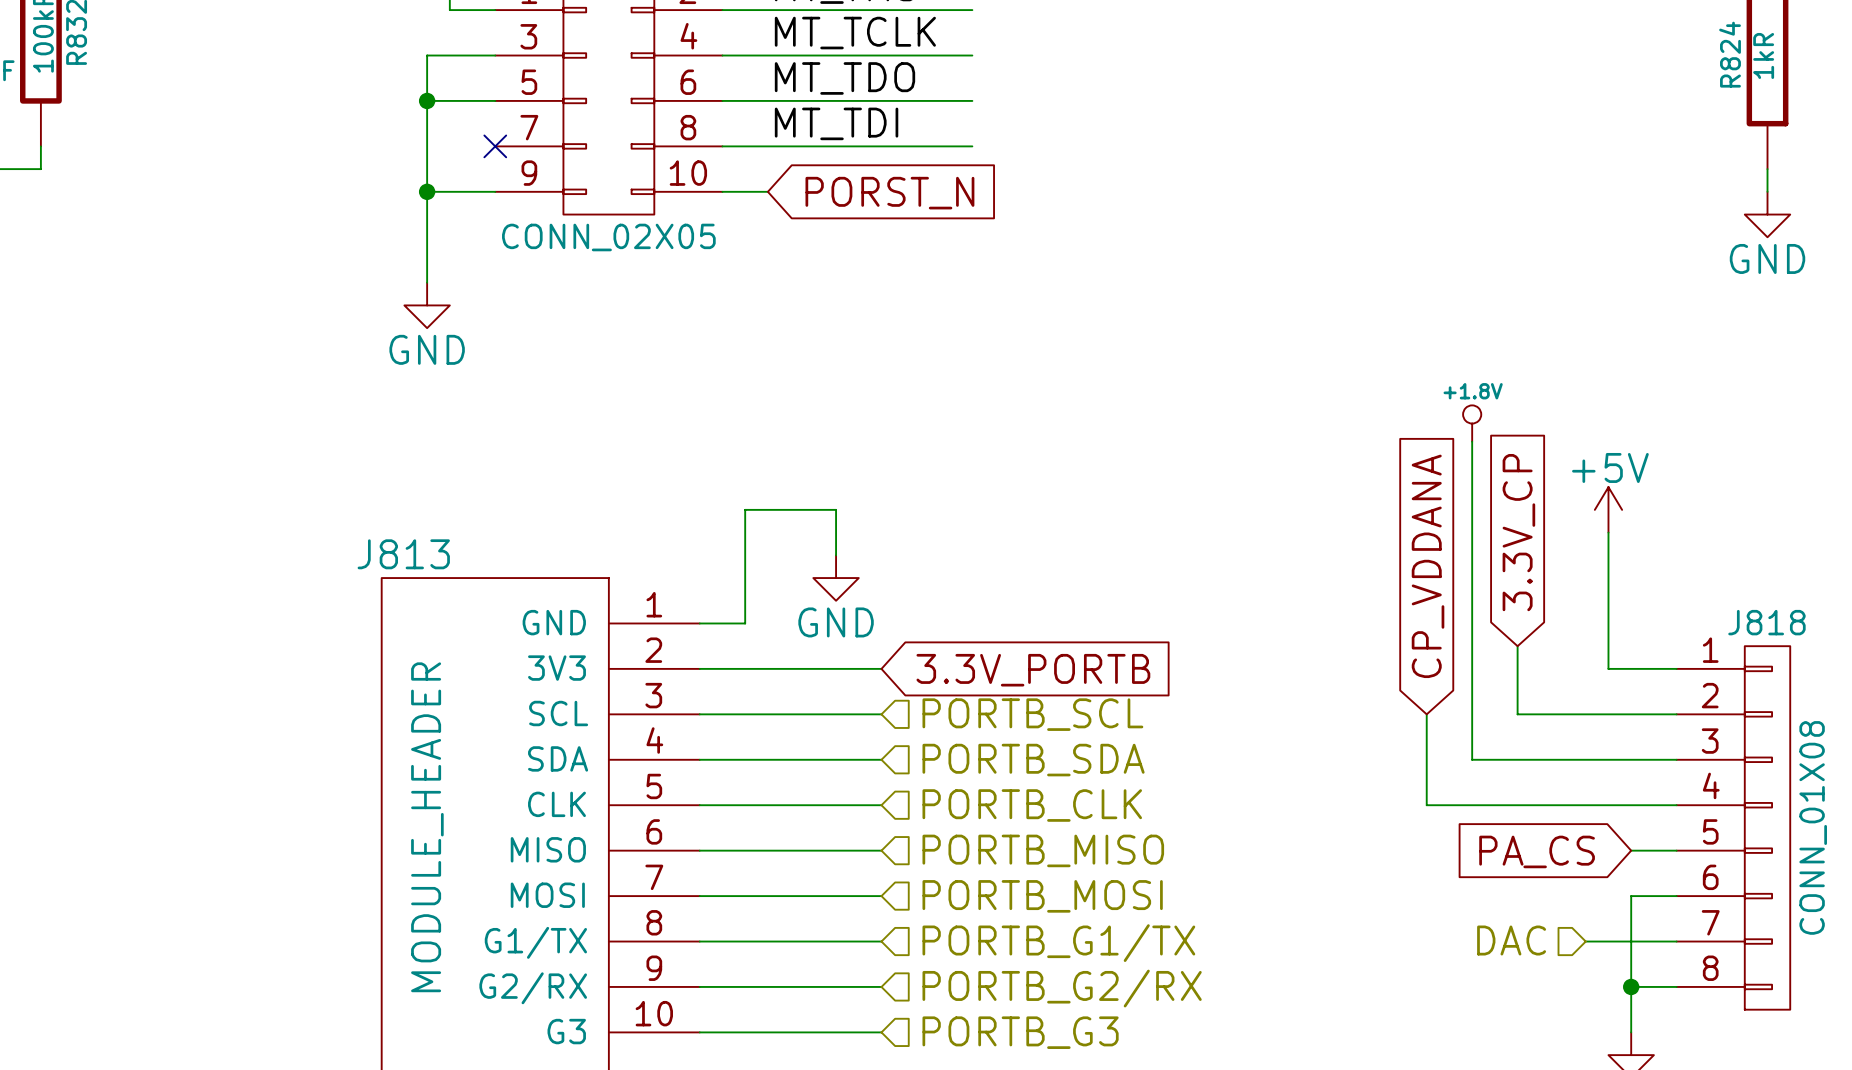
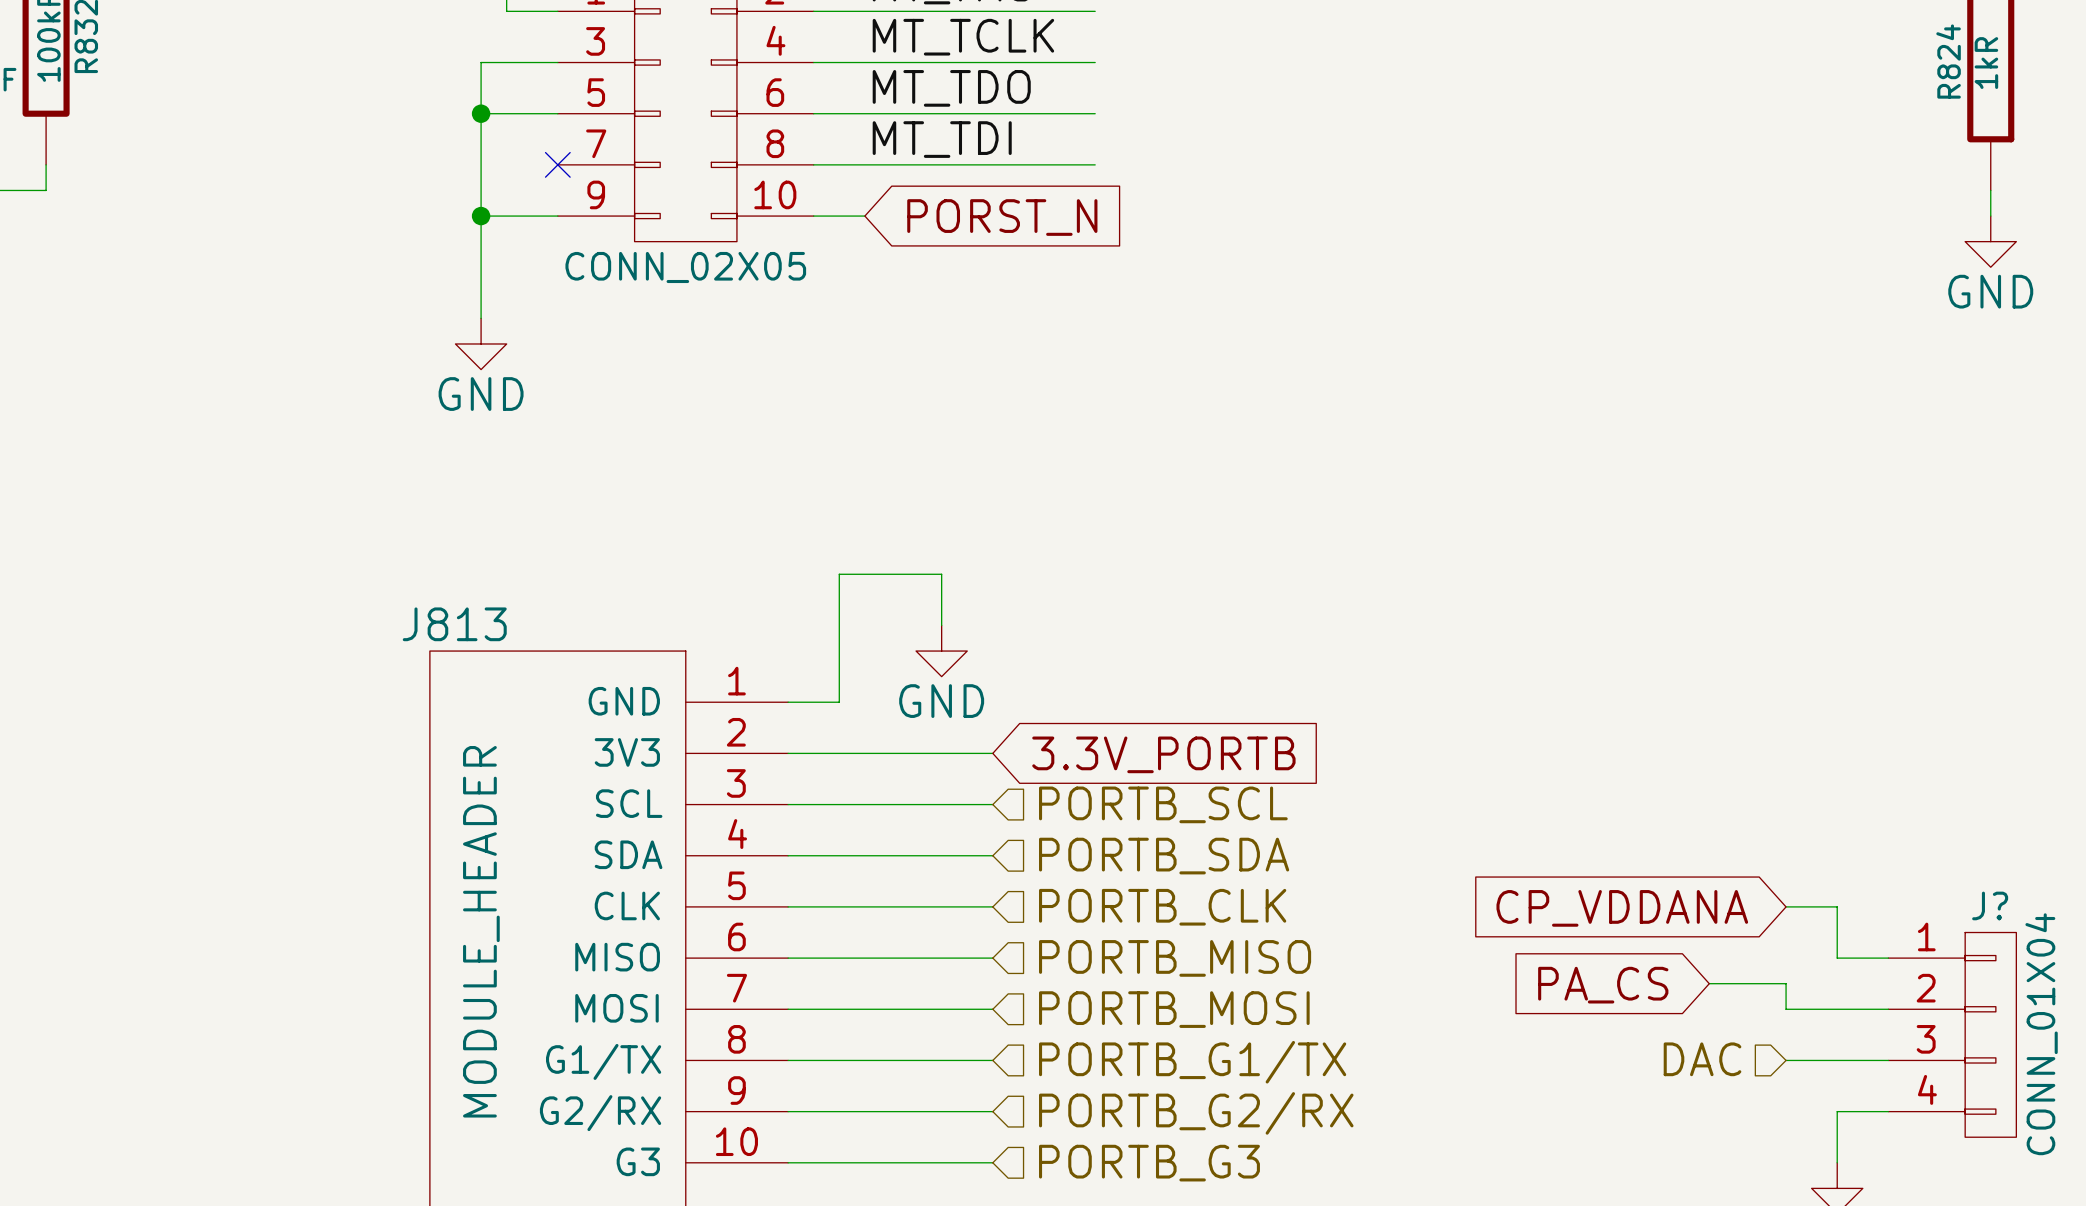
power symbol: +1.8V (1472, 423) -> none
wire: (1472, 441) (1472, 759) (1676, 759) -> none
power symbol: +5V (1608, 509) -> none
global label: 3.3V_CP (1518, 532) -> none
wire: (1608, 532) (1608, 668) (1676, 668) -> none
global label rotation: 0° (1428, 566) -> 90° counterclockwise (1622, 908)
wire: (1517, 646) (1517, 714) (1676, 714) -> none
wire: (1426, 714) (1426, 805) (1585, 805) -> none
wire: (1631, 805) (1676, 805) -> (1837, 906) (1837, 958)
J818: CONN_01X08 (1733, 827) -> none
global label position: PA_CS (1537, 851) -> PA_CS (1603, 985)
wire: (1631, 896) (1631, 986) -> (1837, 1009) (1786, 1009) (1786, 983) (1709, 983)
J?: none -> CONN_01X04 (1952, 1034)
junction: (1631, 986) -> none

